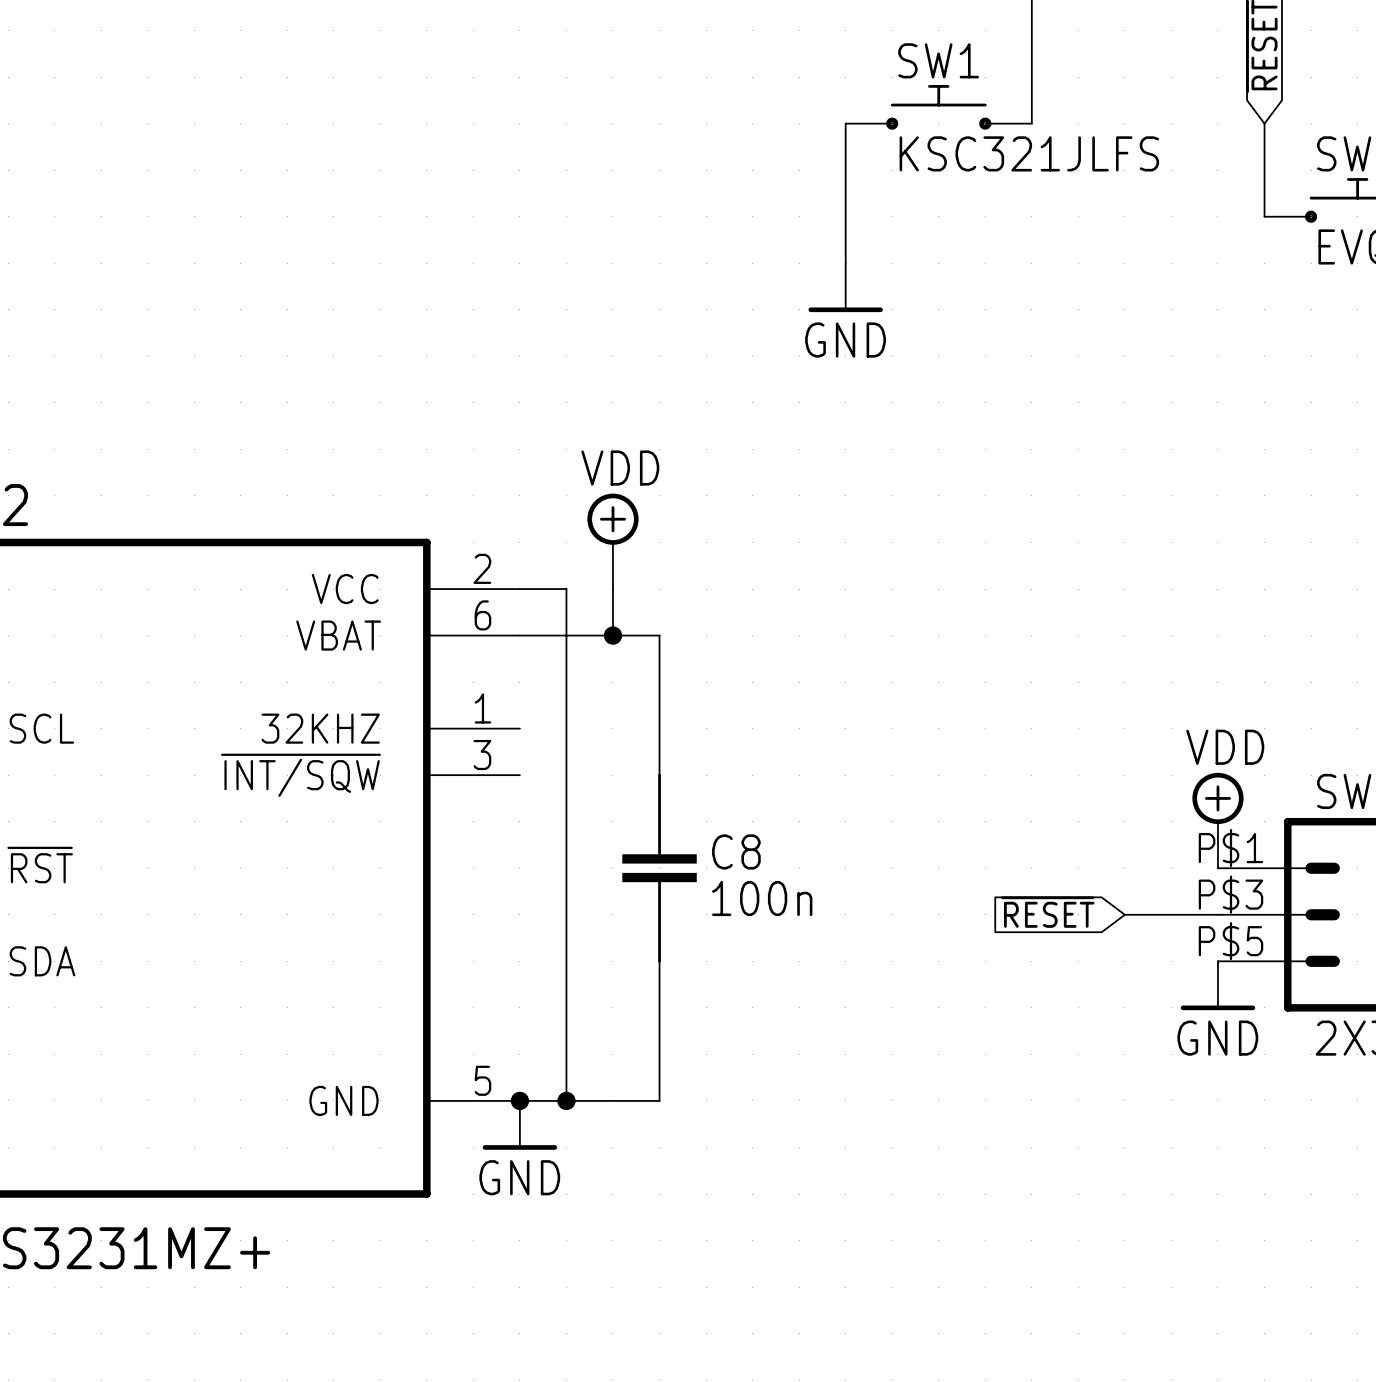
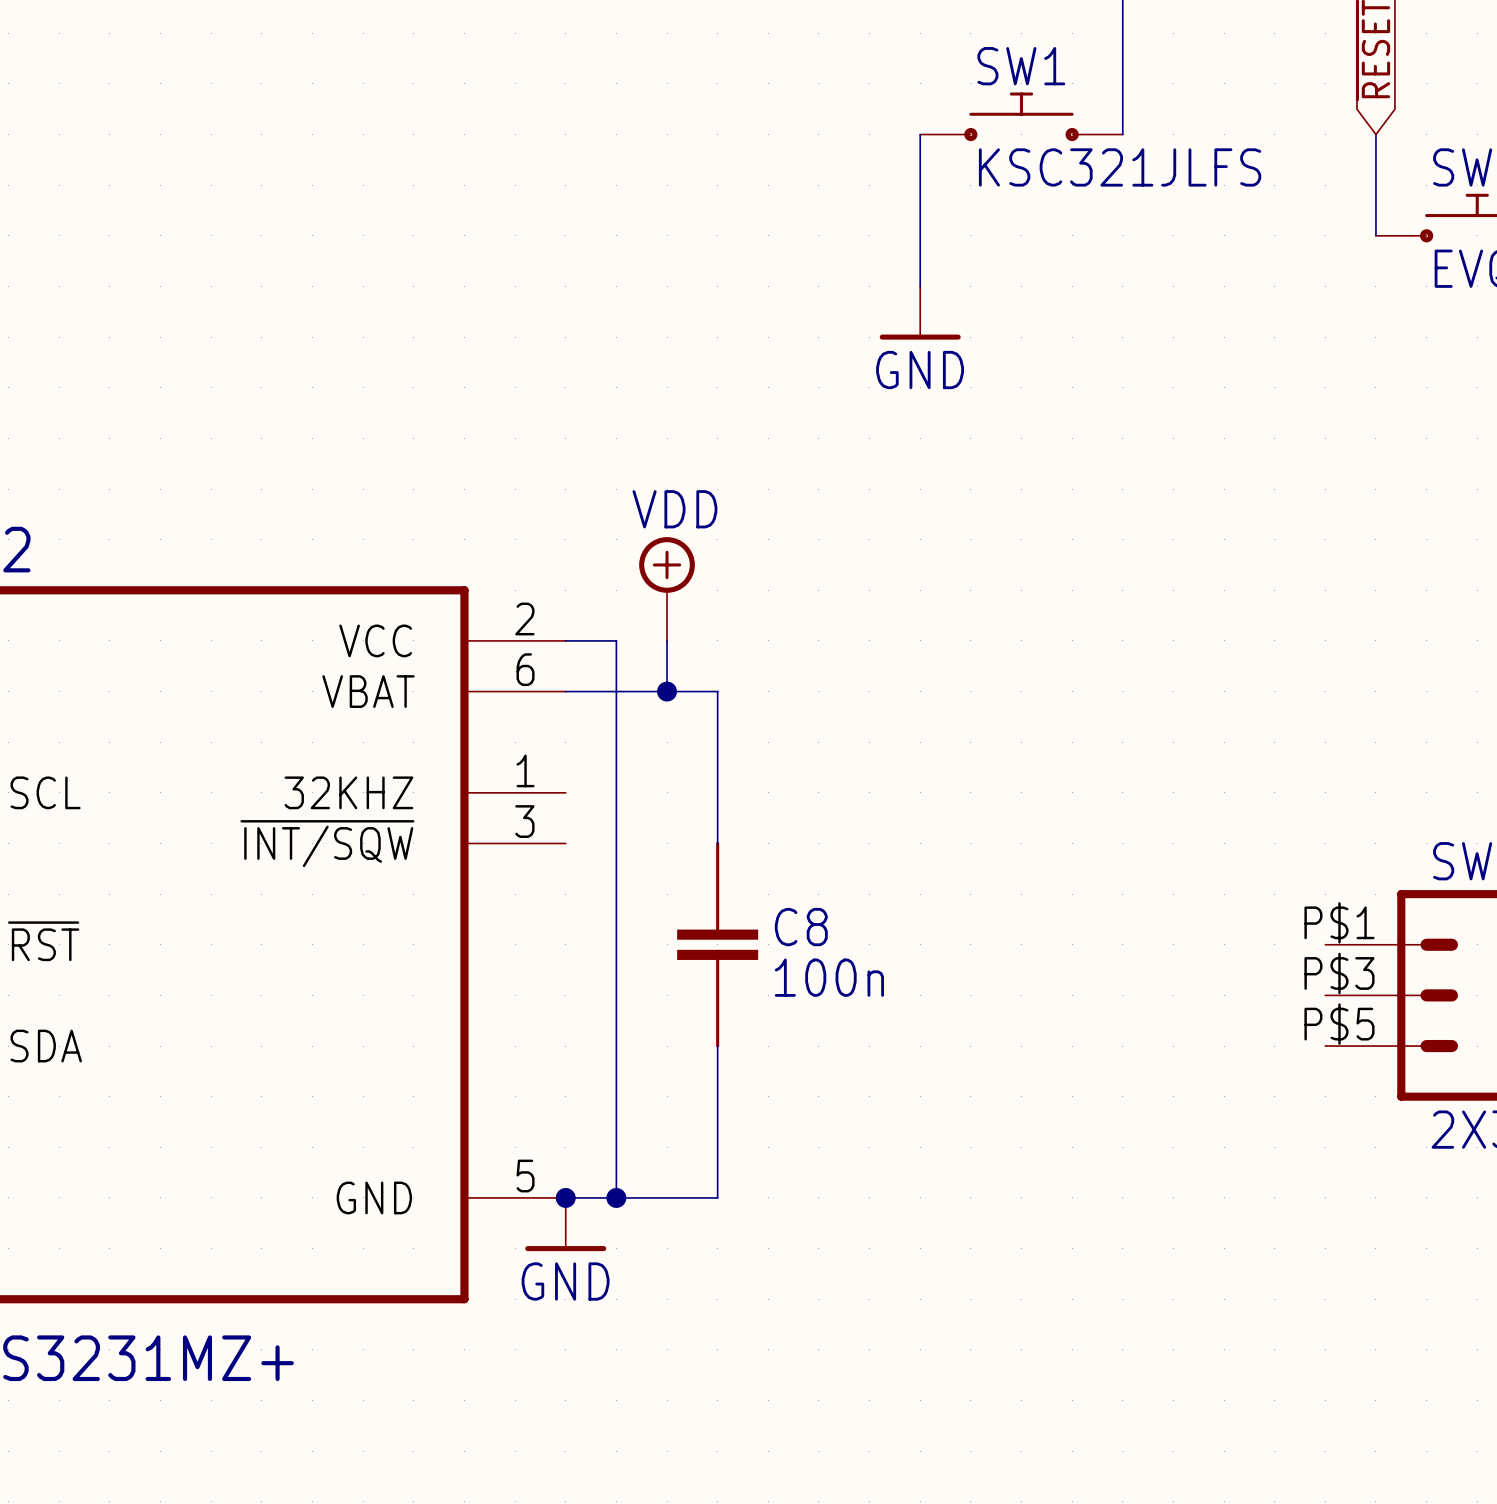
power symbol: VDD (1217, 820) -> none
global label: ~{RESET} (1047, 912) -> none
wire: (1124, 914) (1217, 914) -> none
power symbol: GND (1217, 985) -> none

